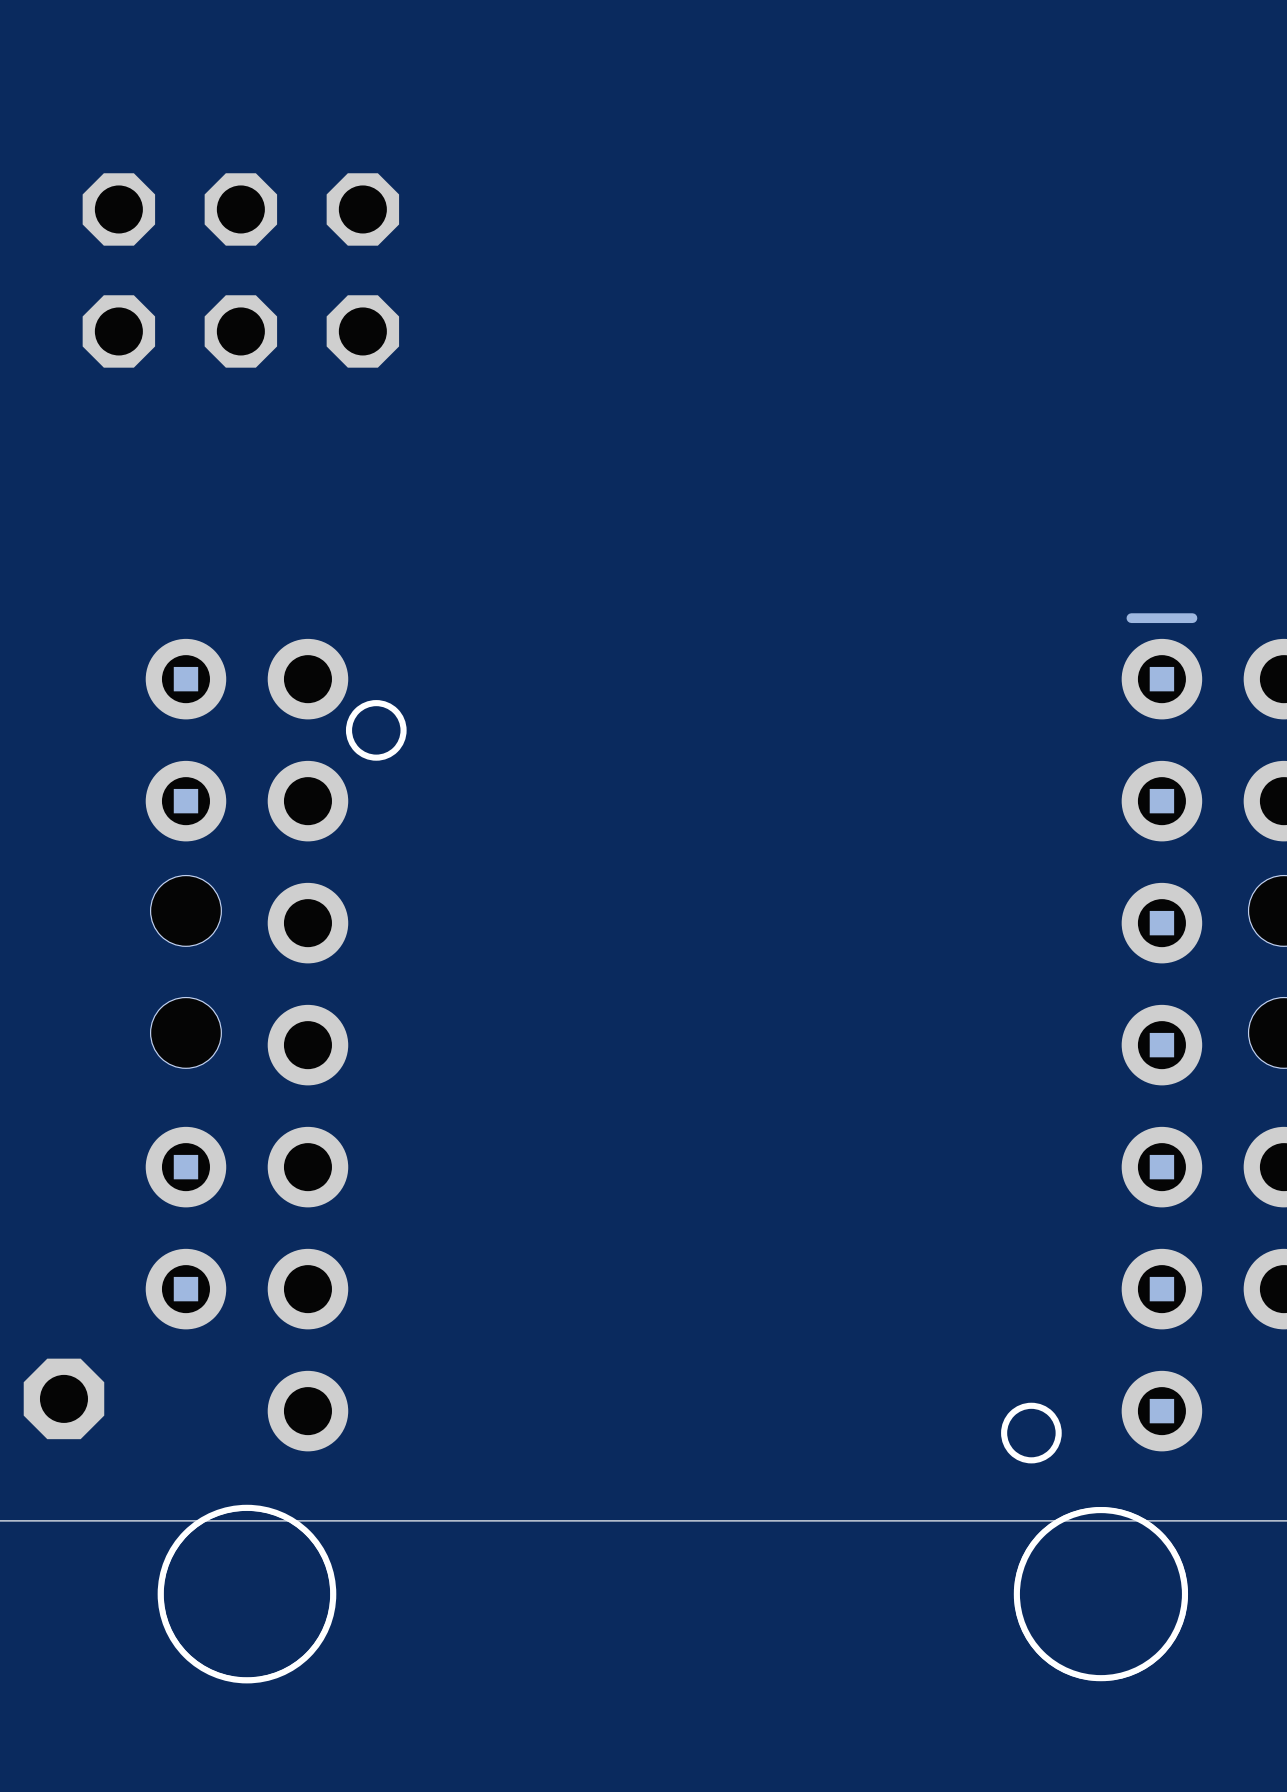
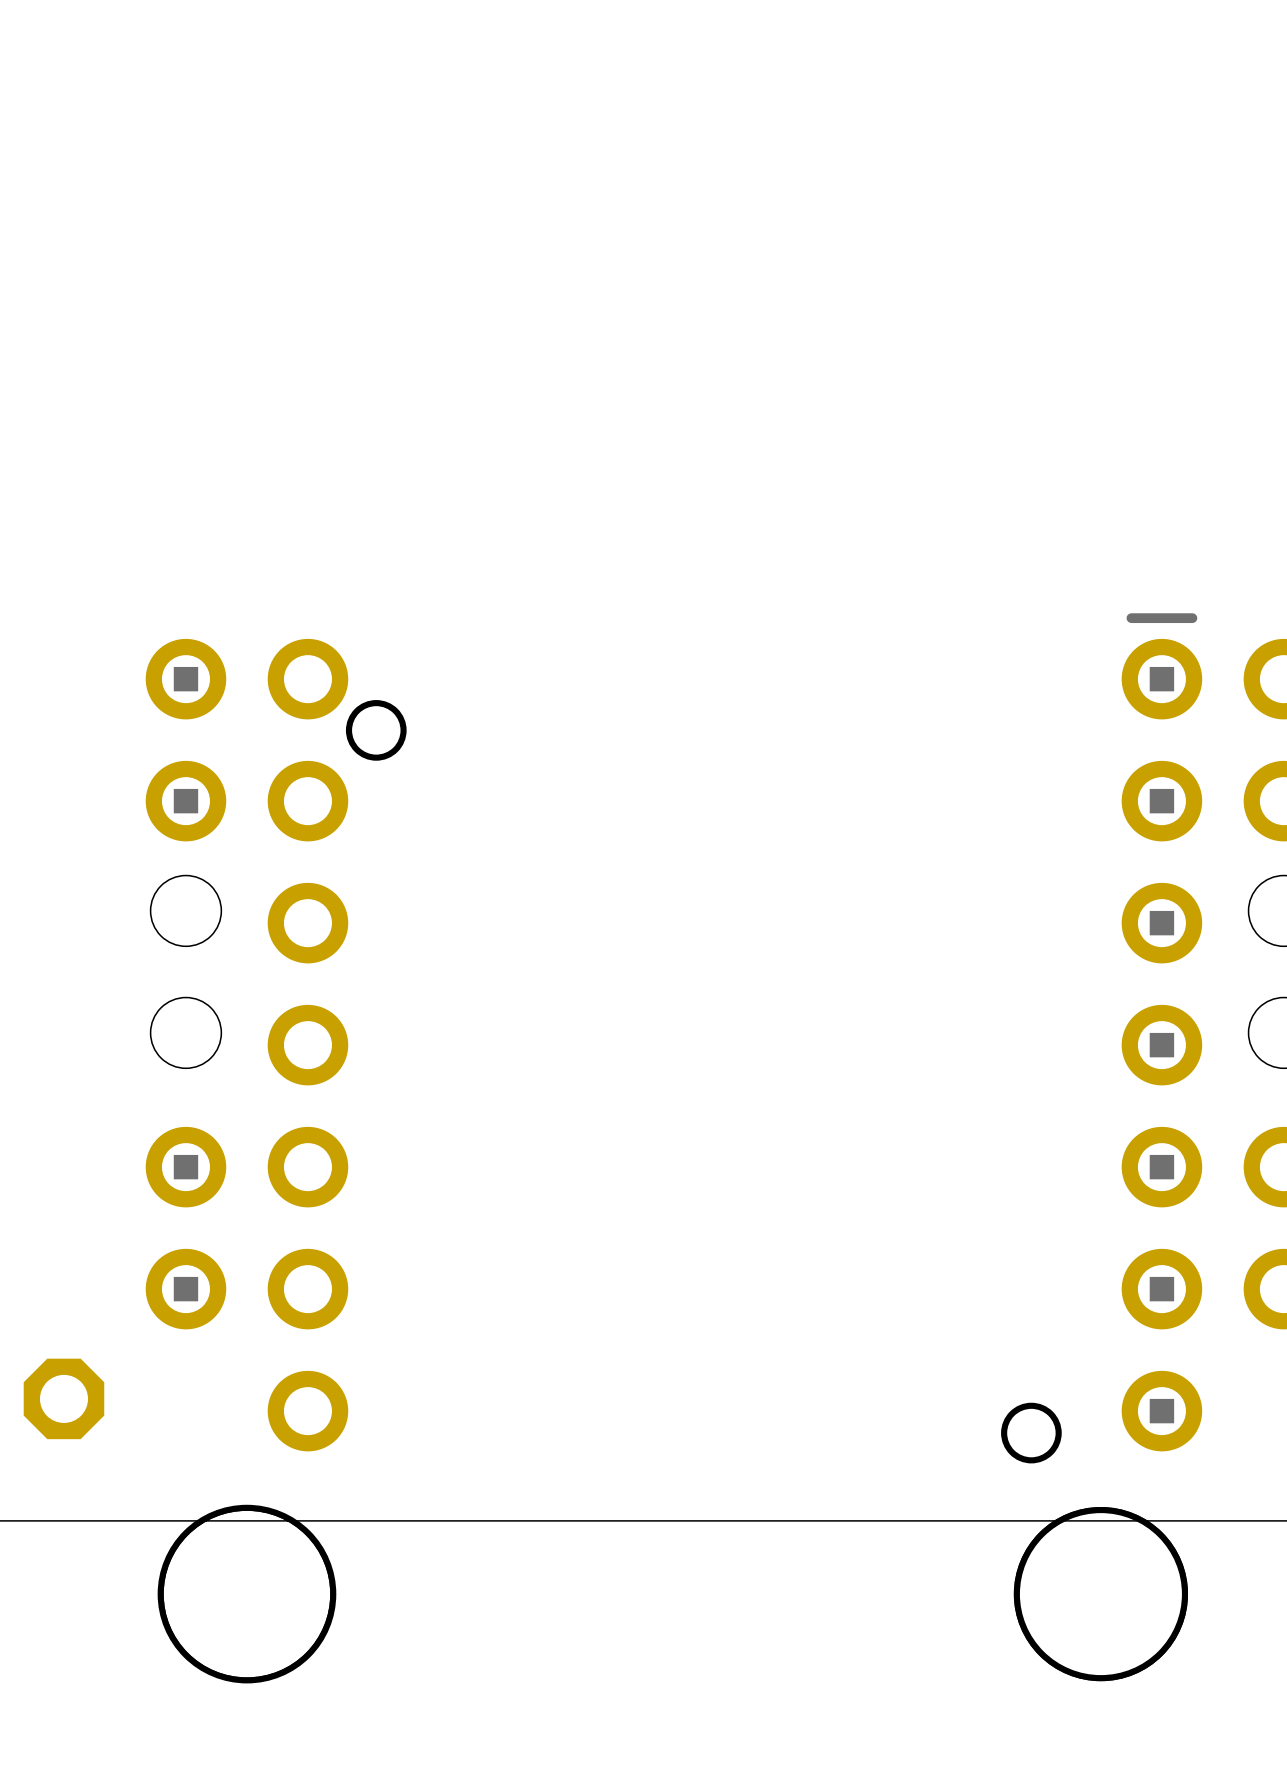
part: (240, 270) -> none

